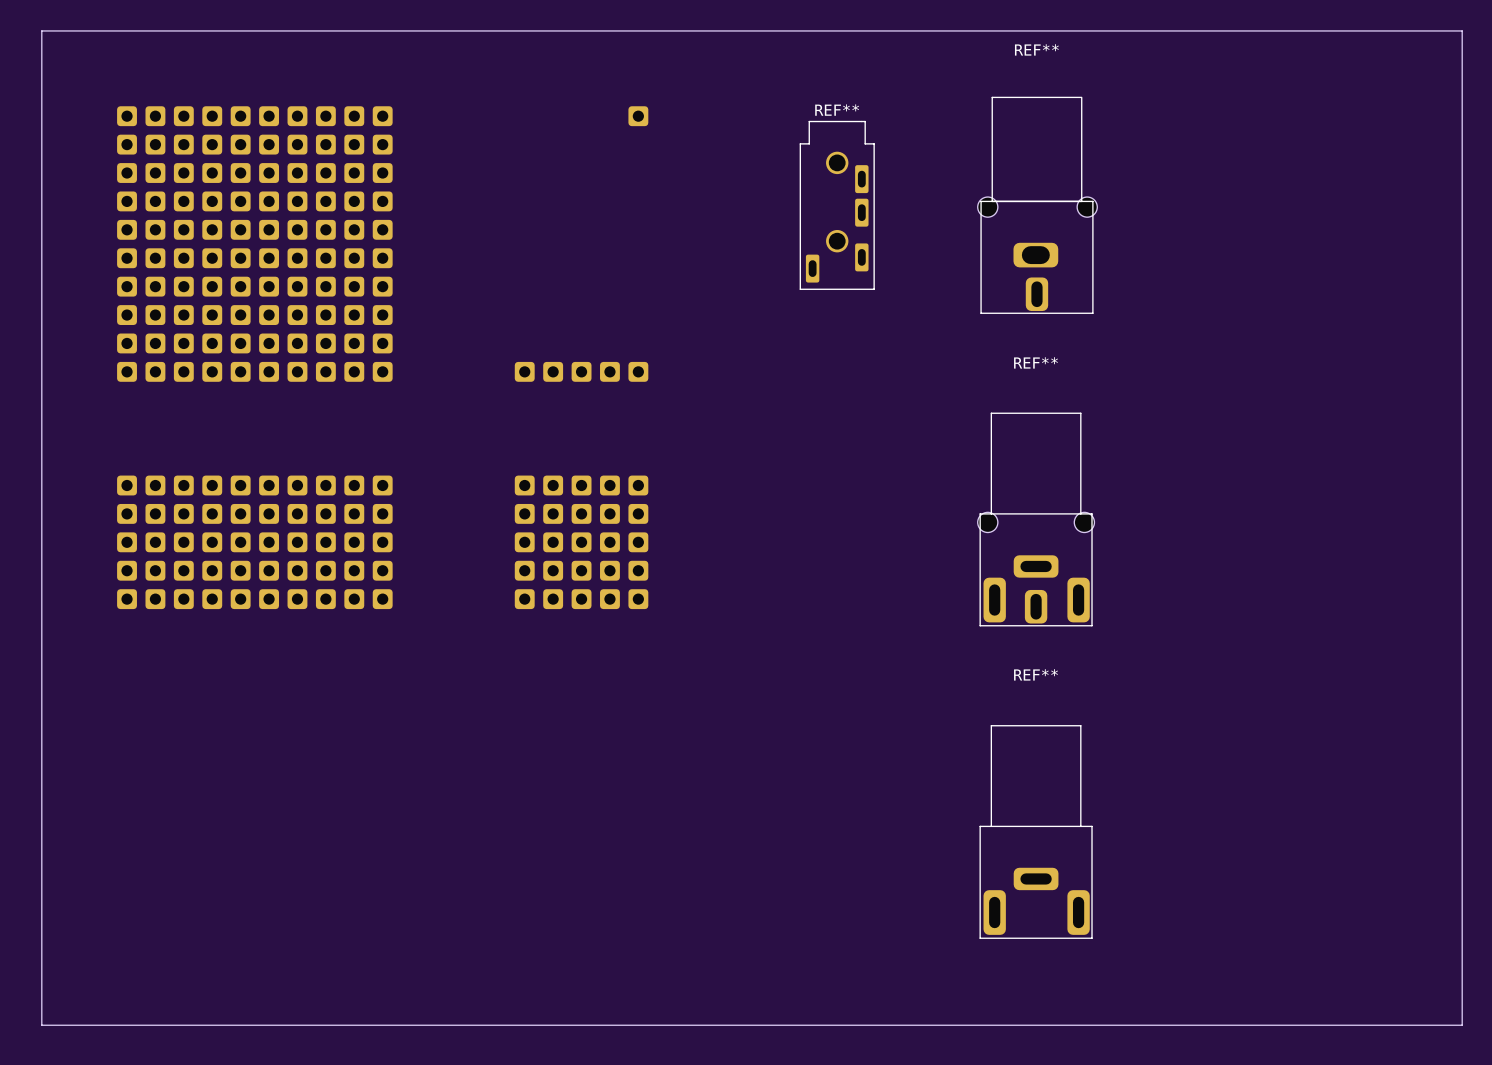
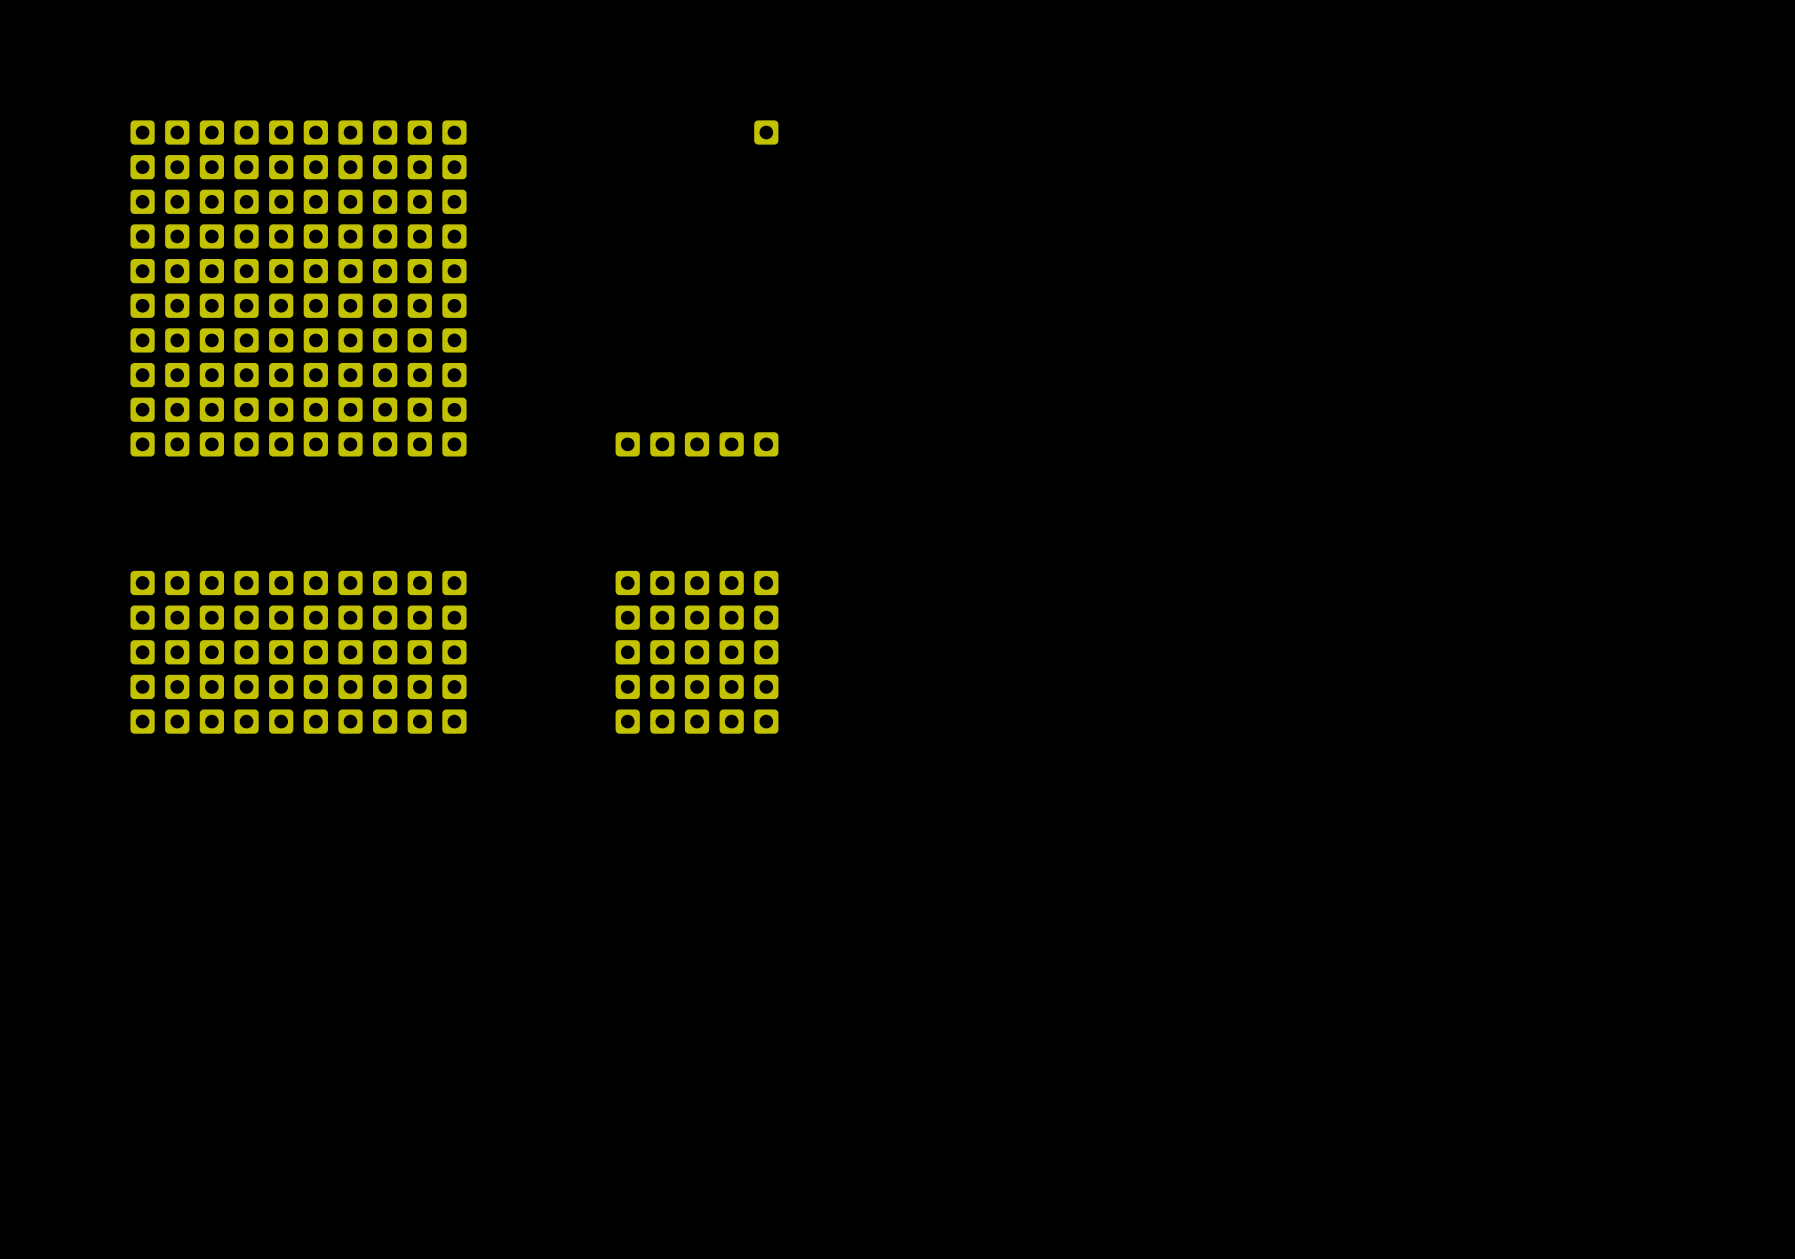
board edge: (41, 30) (1462, 30) (1462, 1025) (41, 1025) (41, 30) -> none
REF**: (837, 205) -> none
REF**: (1037, 205) -> none
REF**: (1036, 519) -> none
REF**: (1036, 831) -> none

